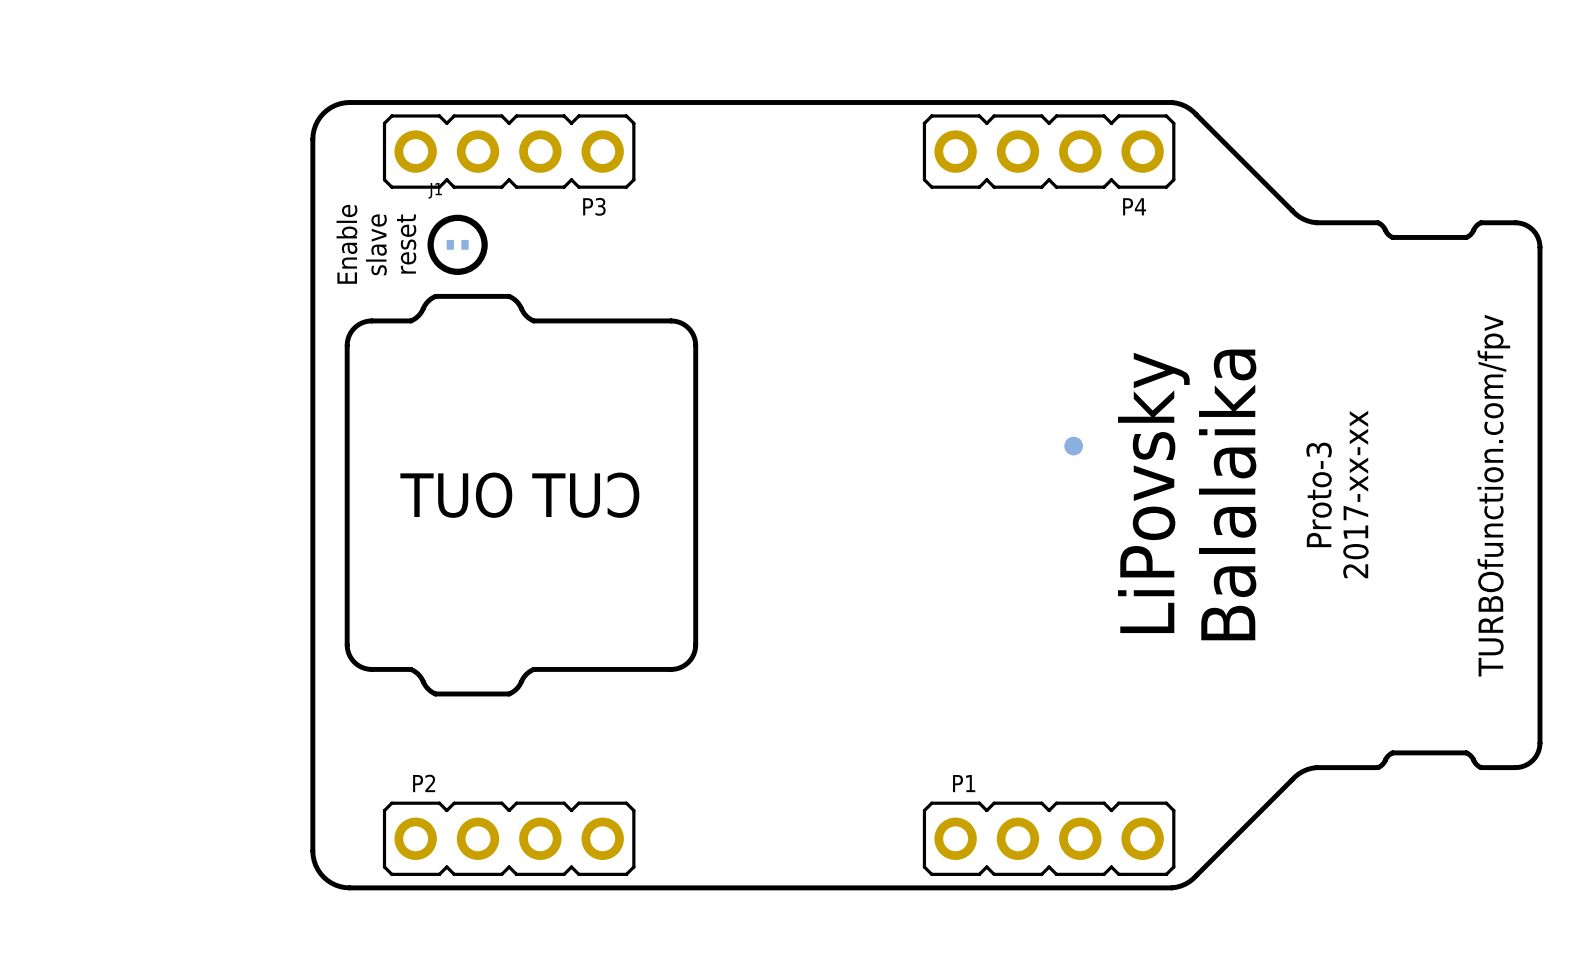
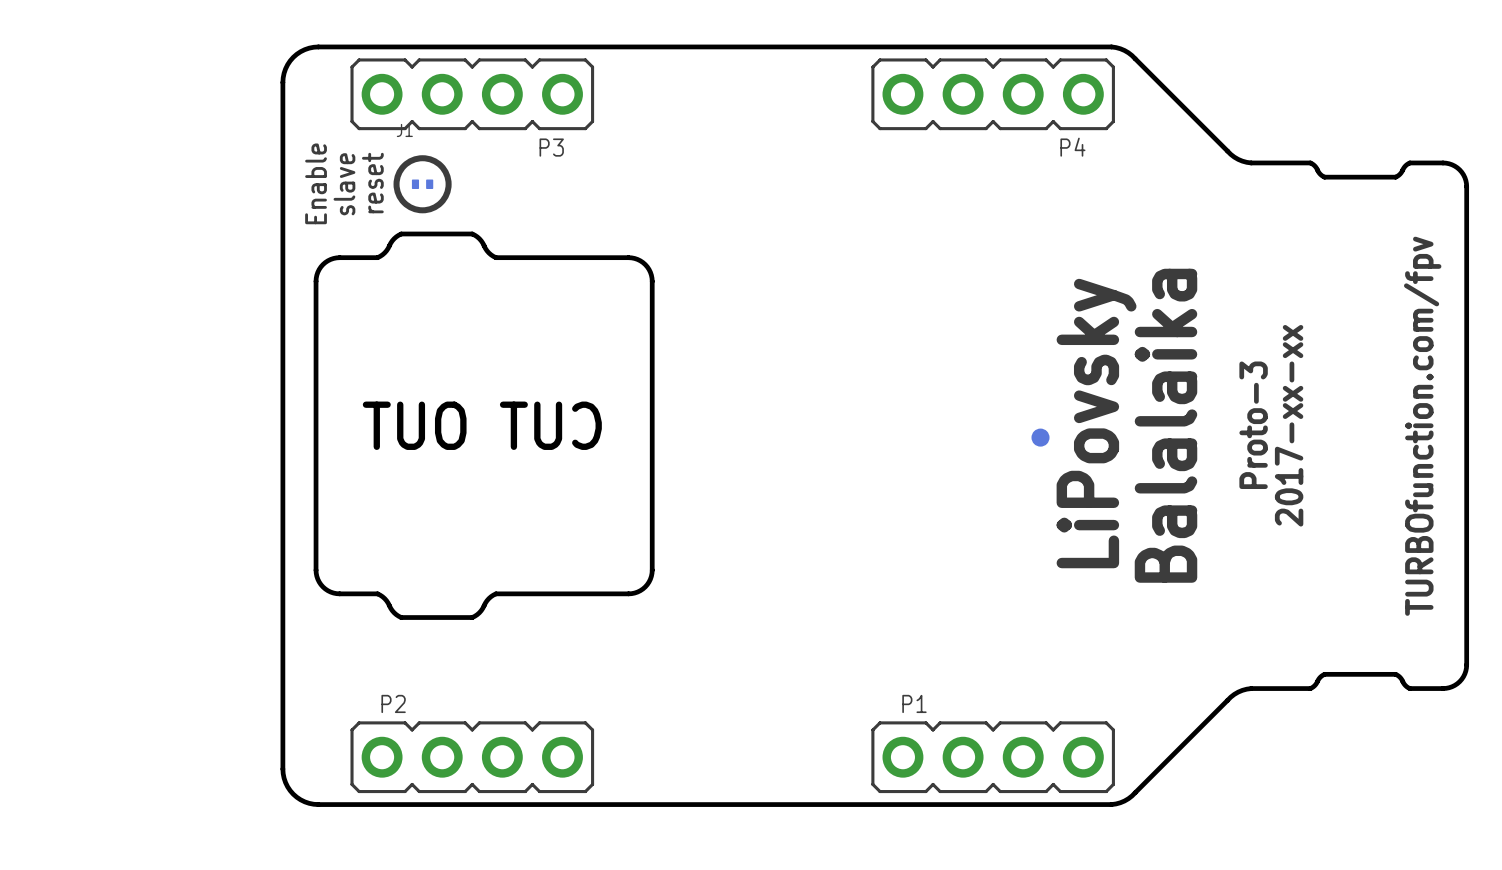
part position: (1073, 446) -> (1040, 437)

